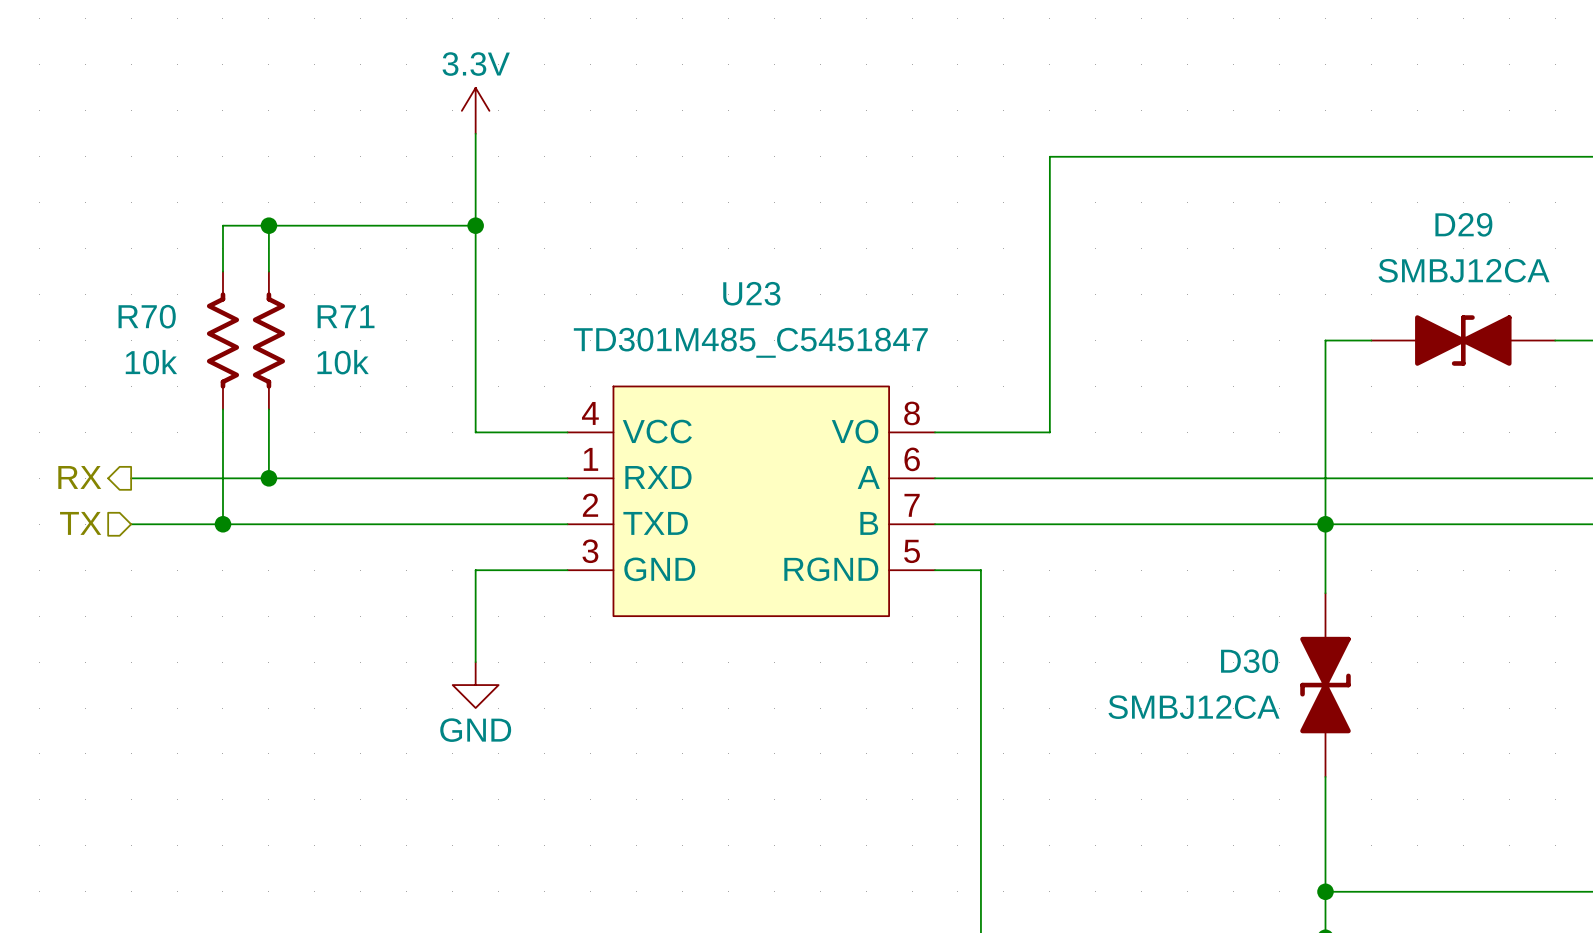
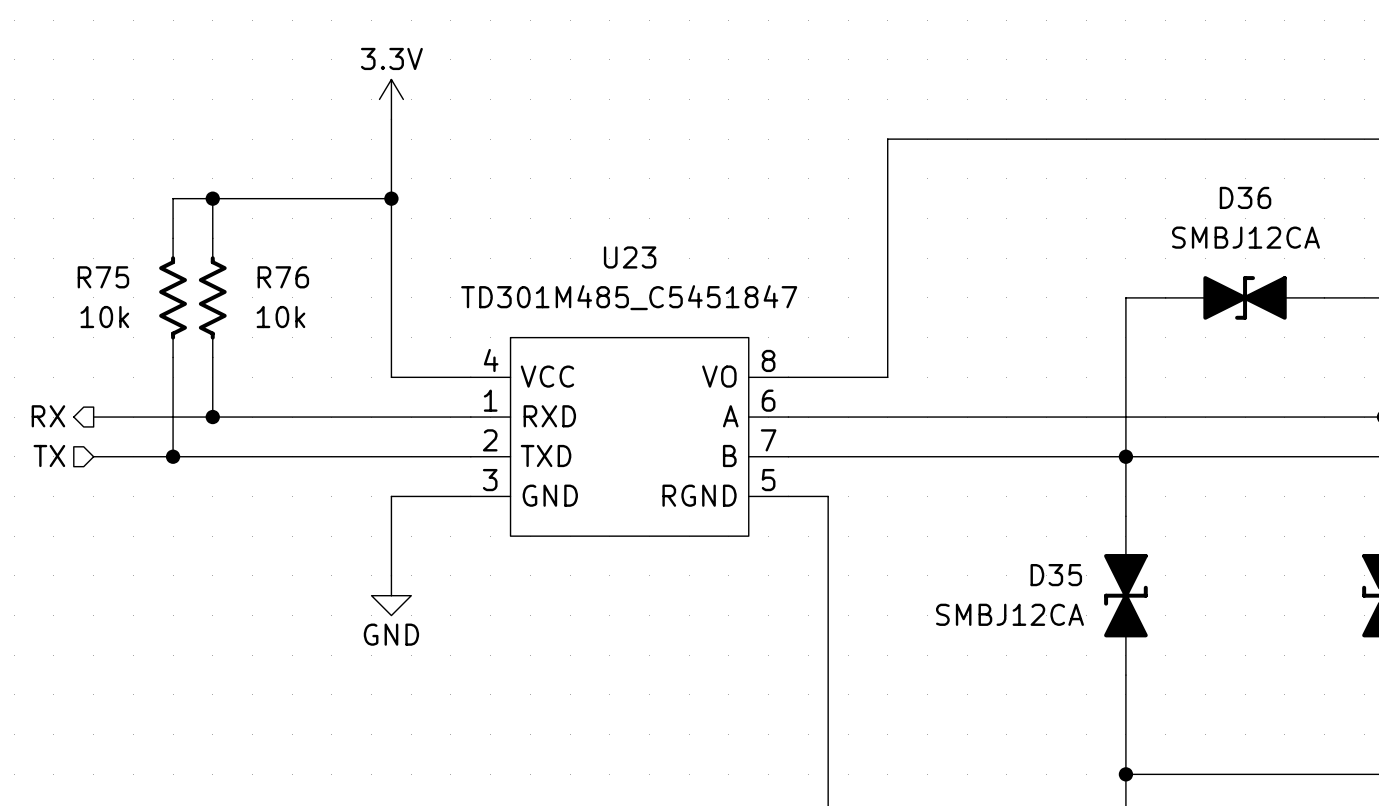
D29 name: D29 (1463, 224) -> D36 (1245, 197)
R70 name: R70 (147, 316) -> R75 (103, 277)
R71 name: R71 (346, 316) -> R76 (283, 277)
D30 name: D30 (1249, 661) -> D35 (1056, 575)

